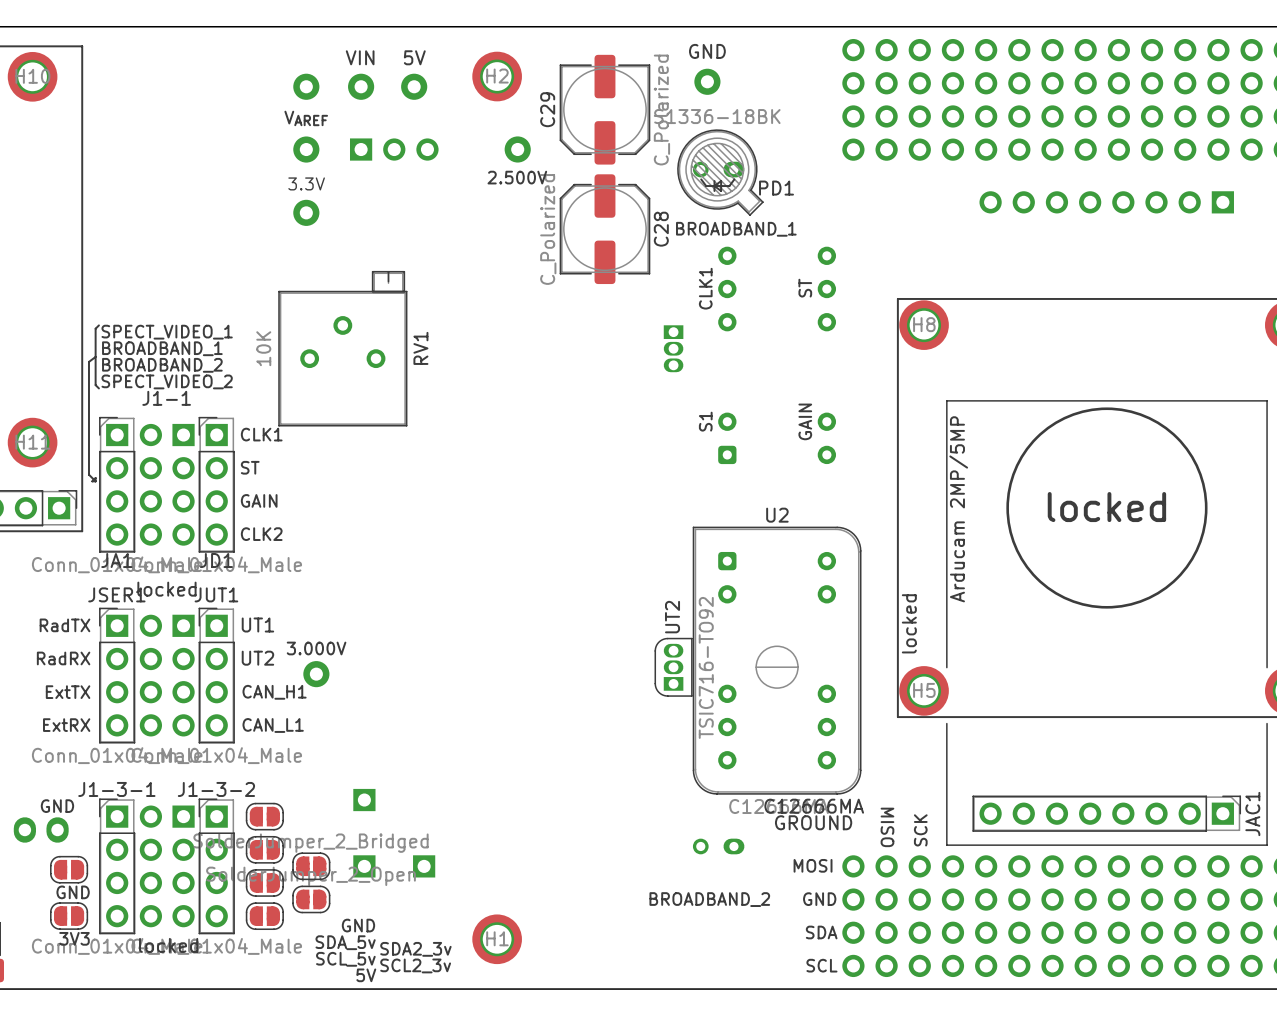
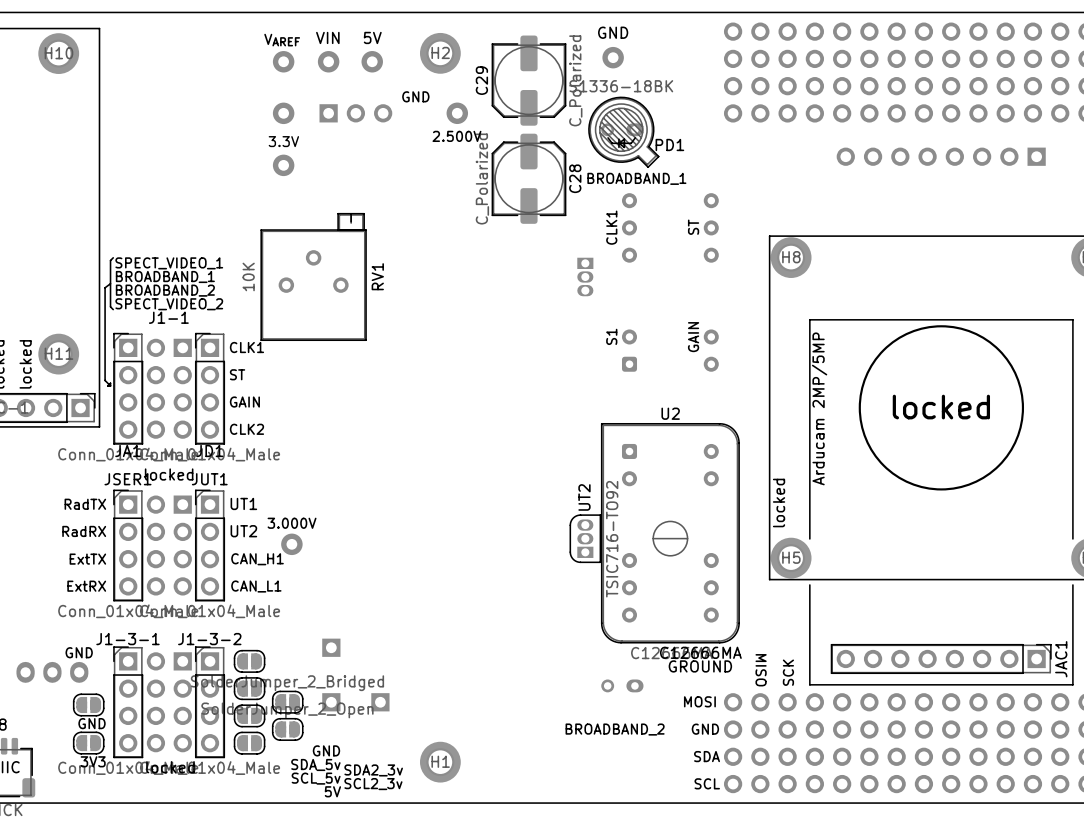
text position: VAREF (306, 118) -> VAREF (282, 40)
text: none -> GND (415, 96)

